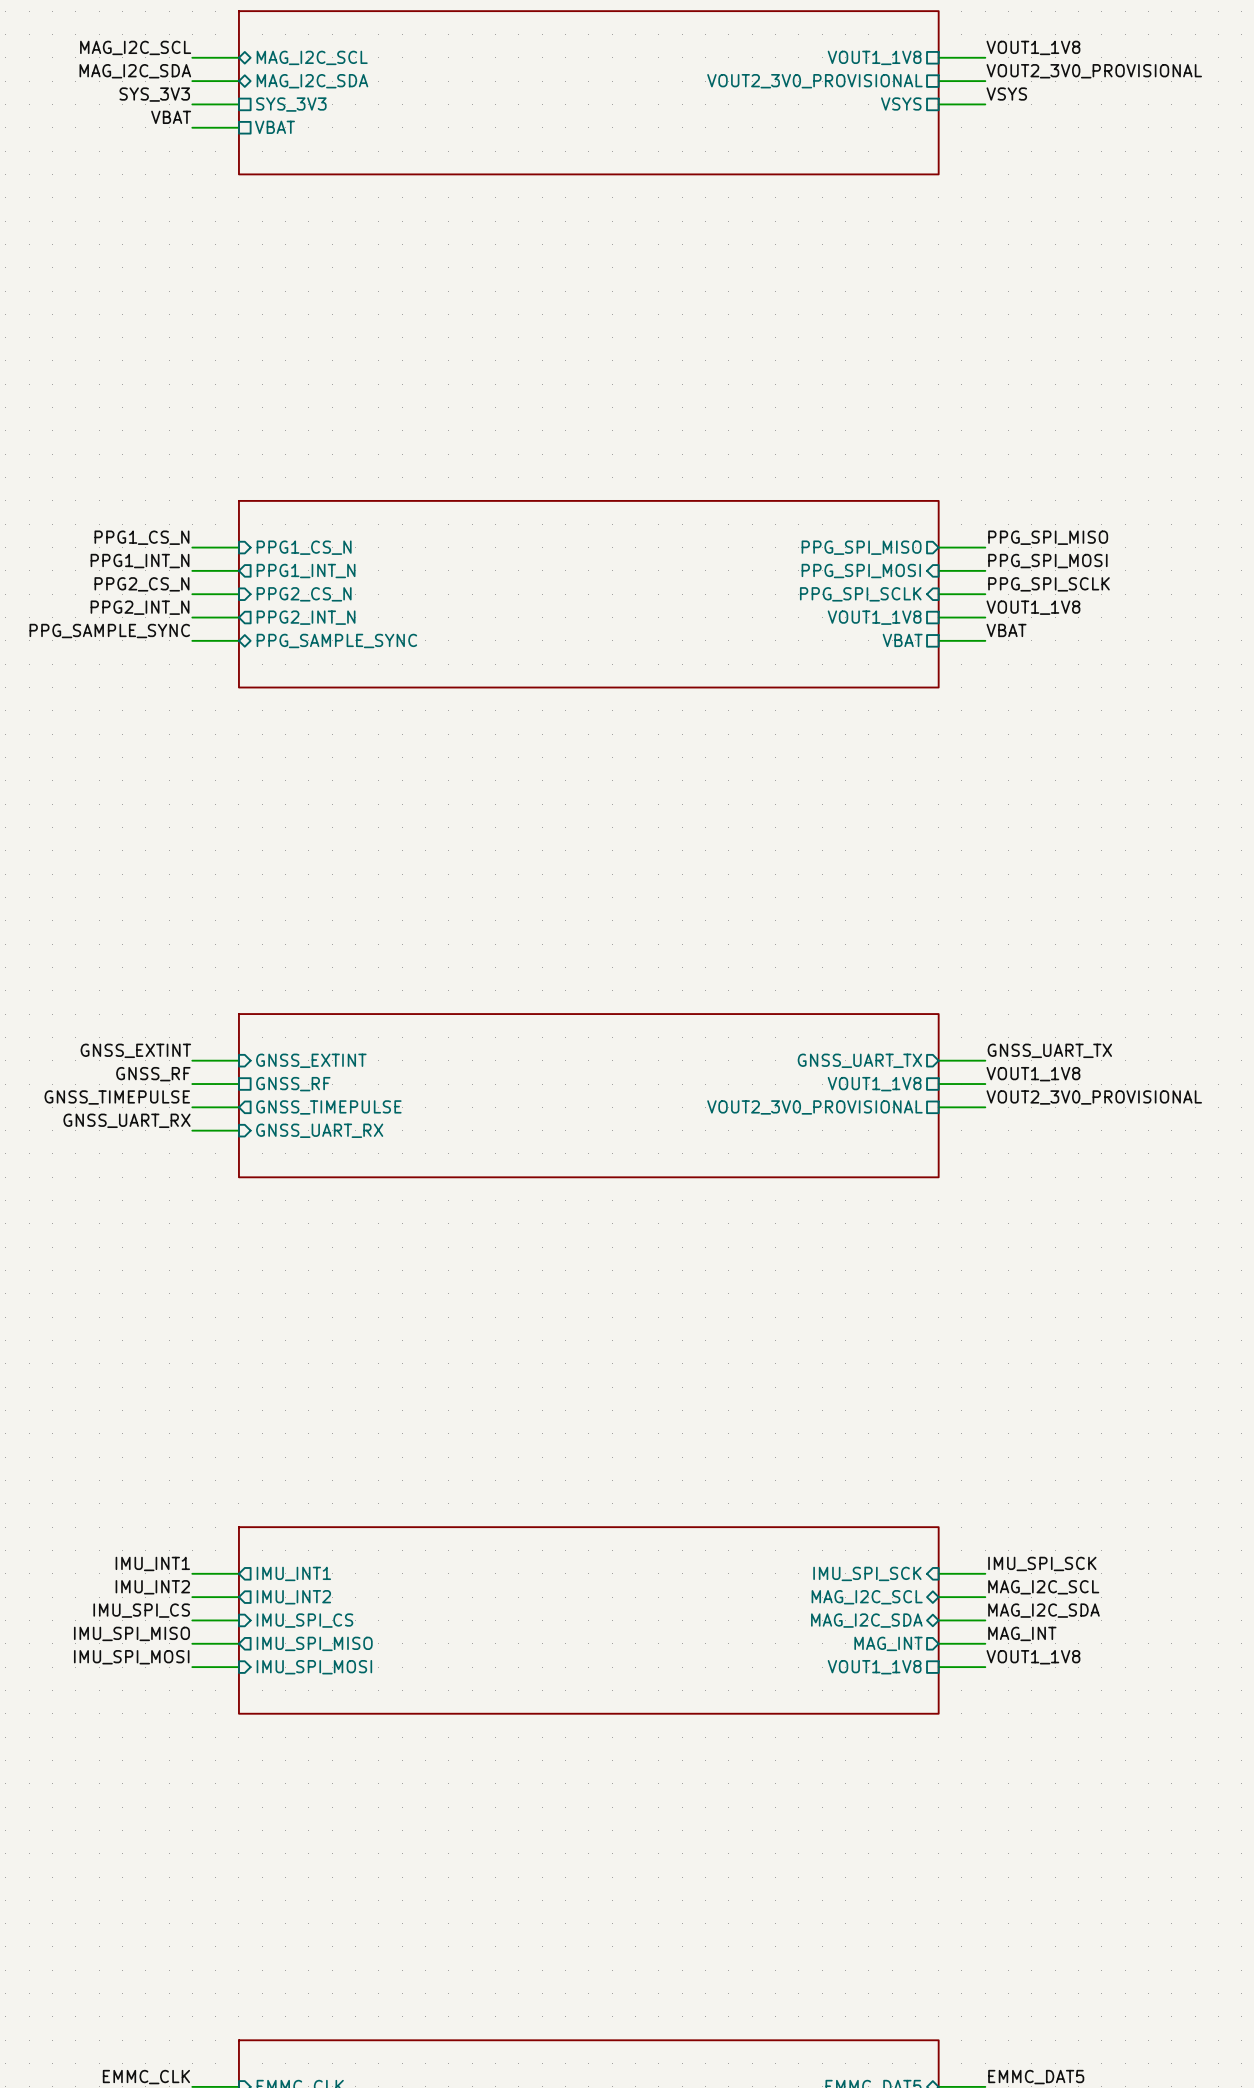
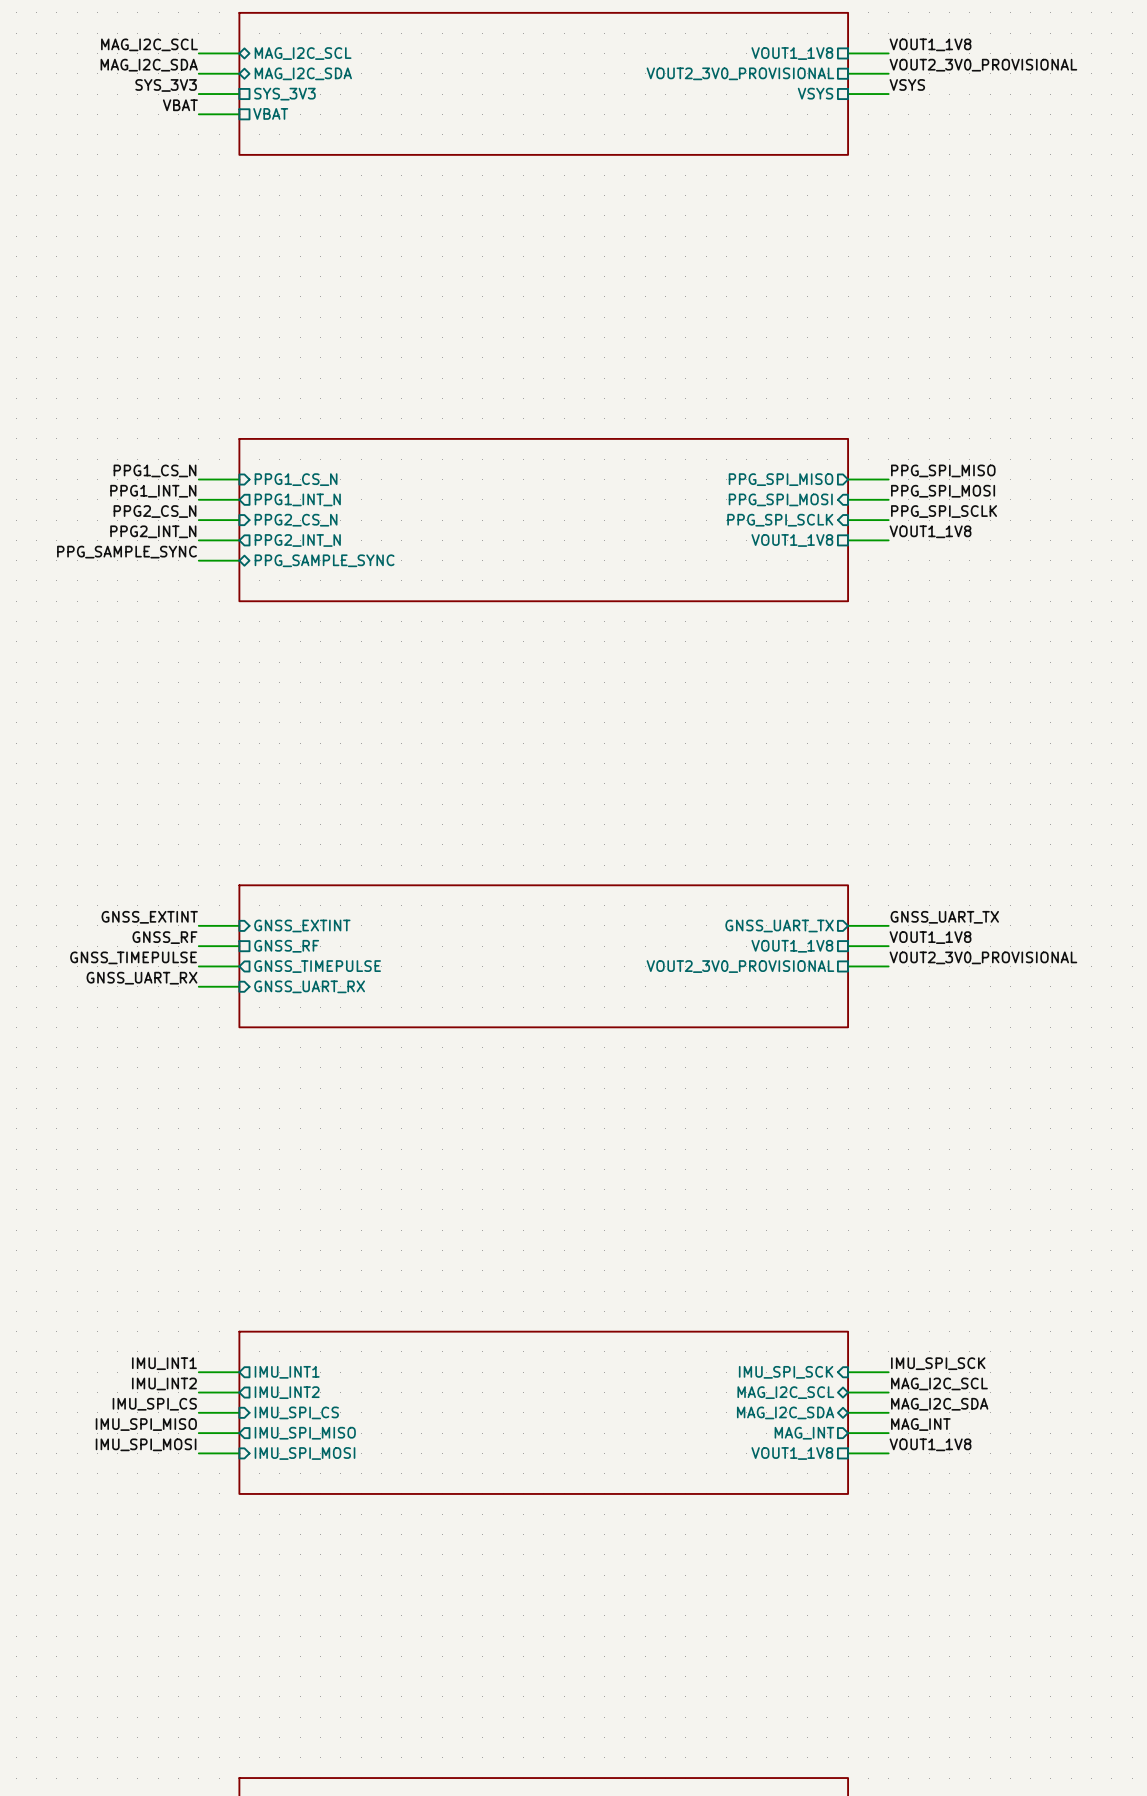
label: VBAT (1006, 630) -> none
sheet pin: VBAT (902, 640) -> none
wire: (938, 640) (985, 640) -> none

